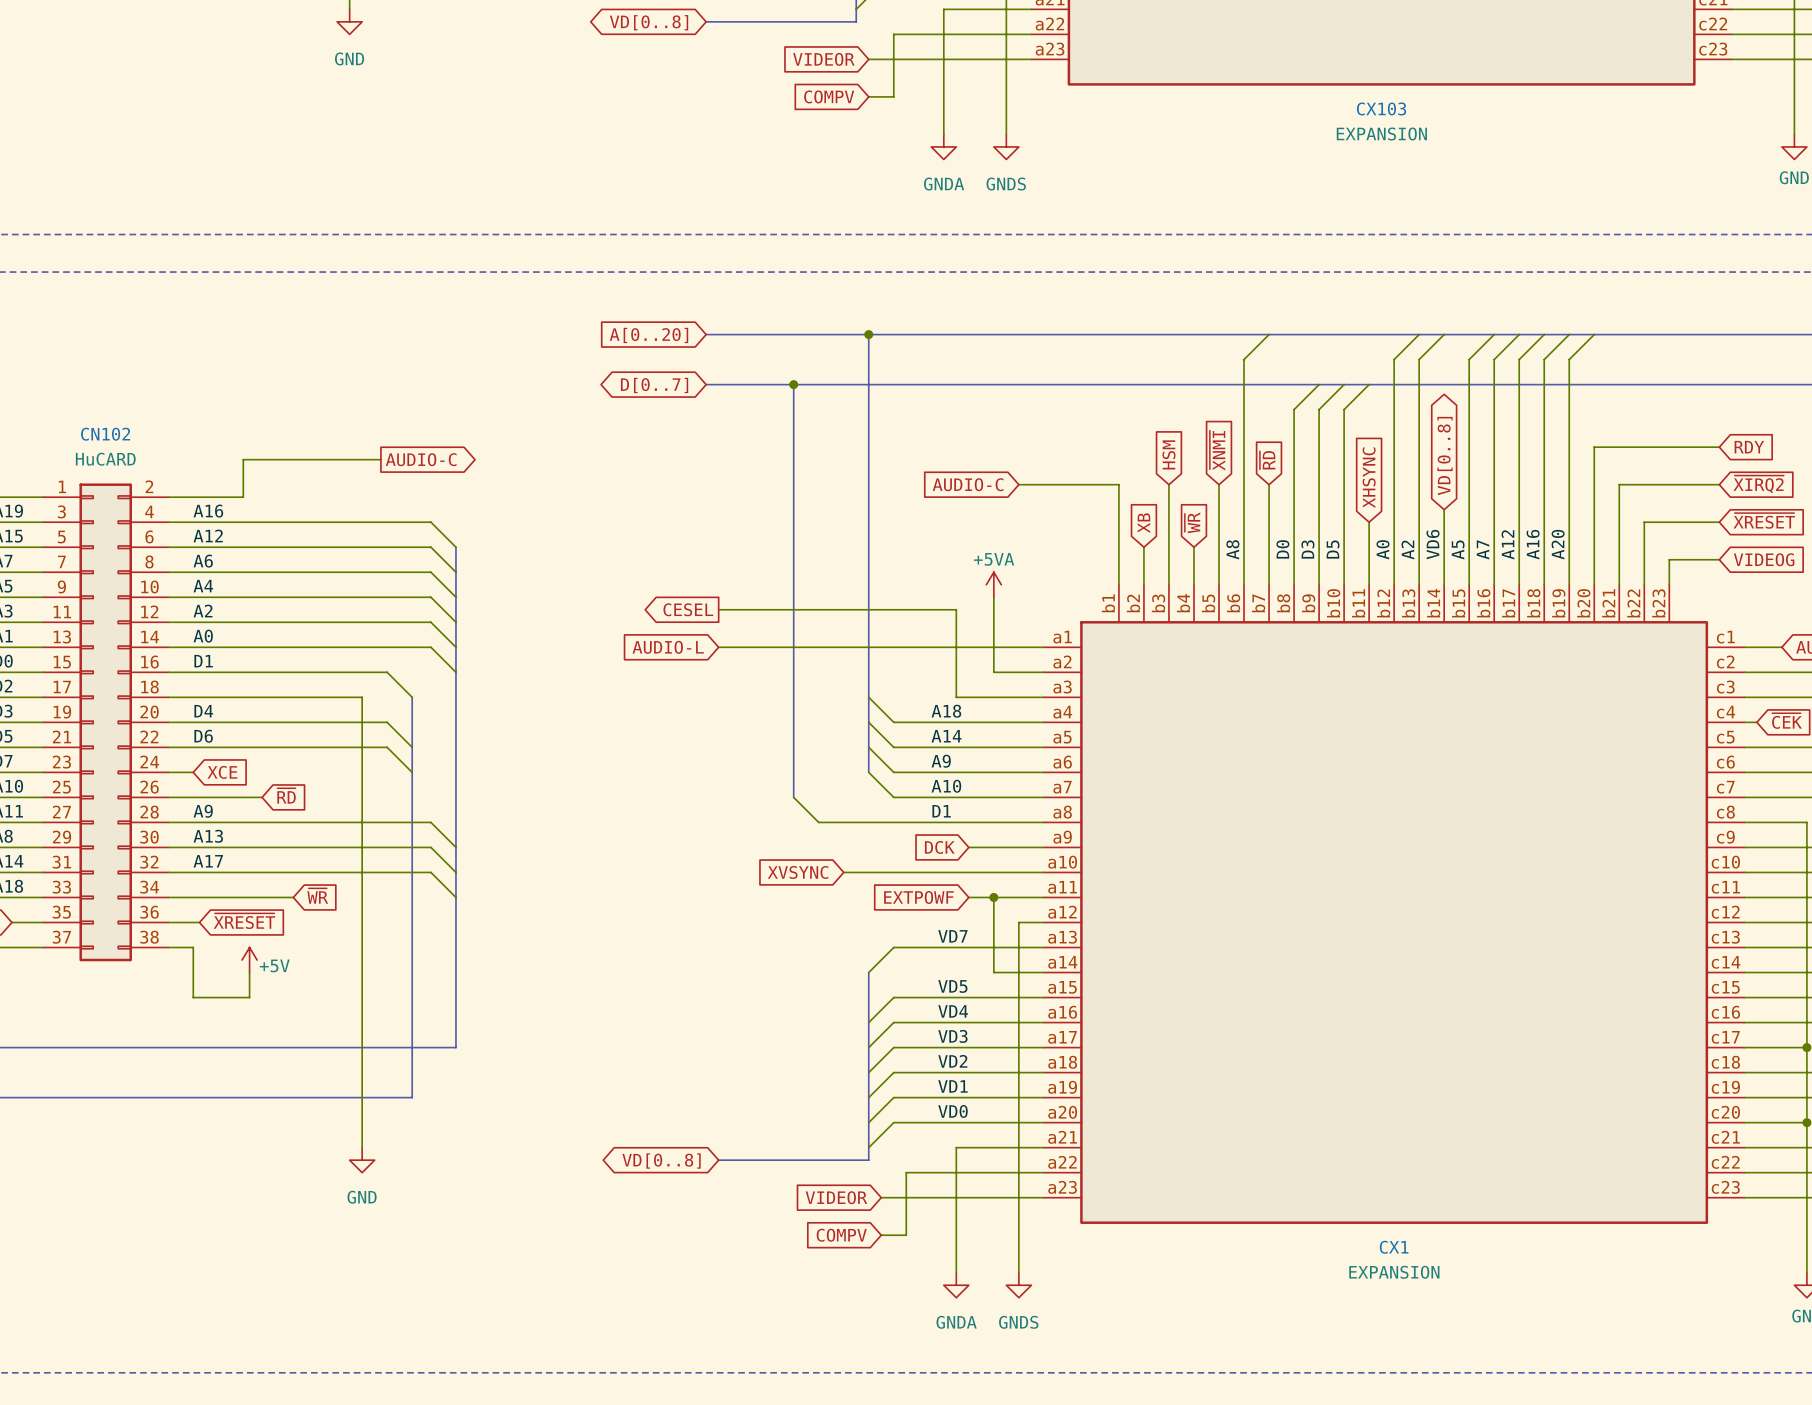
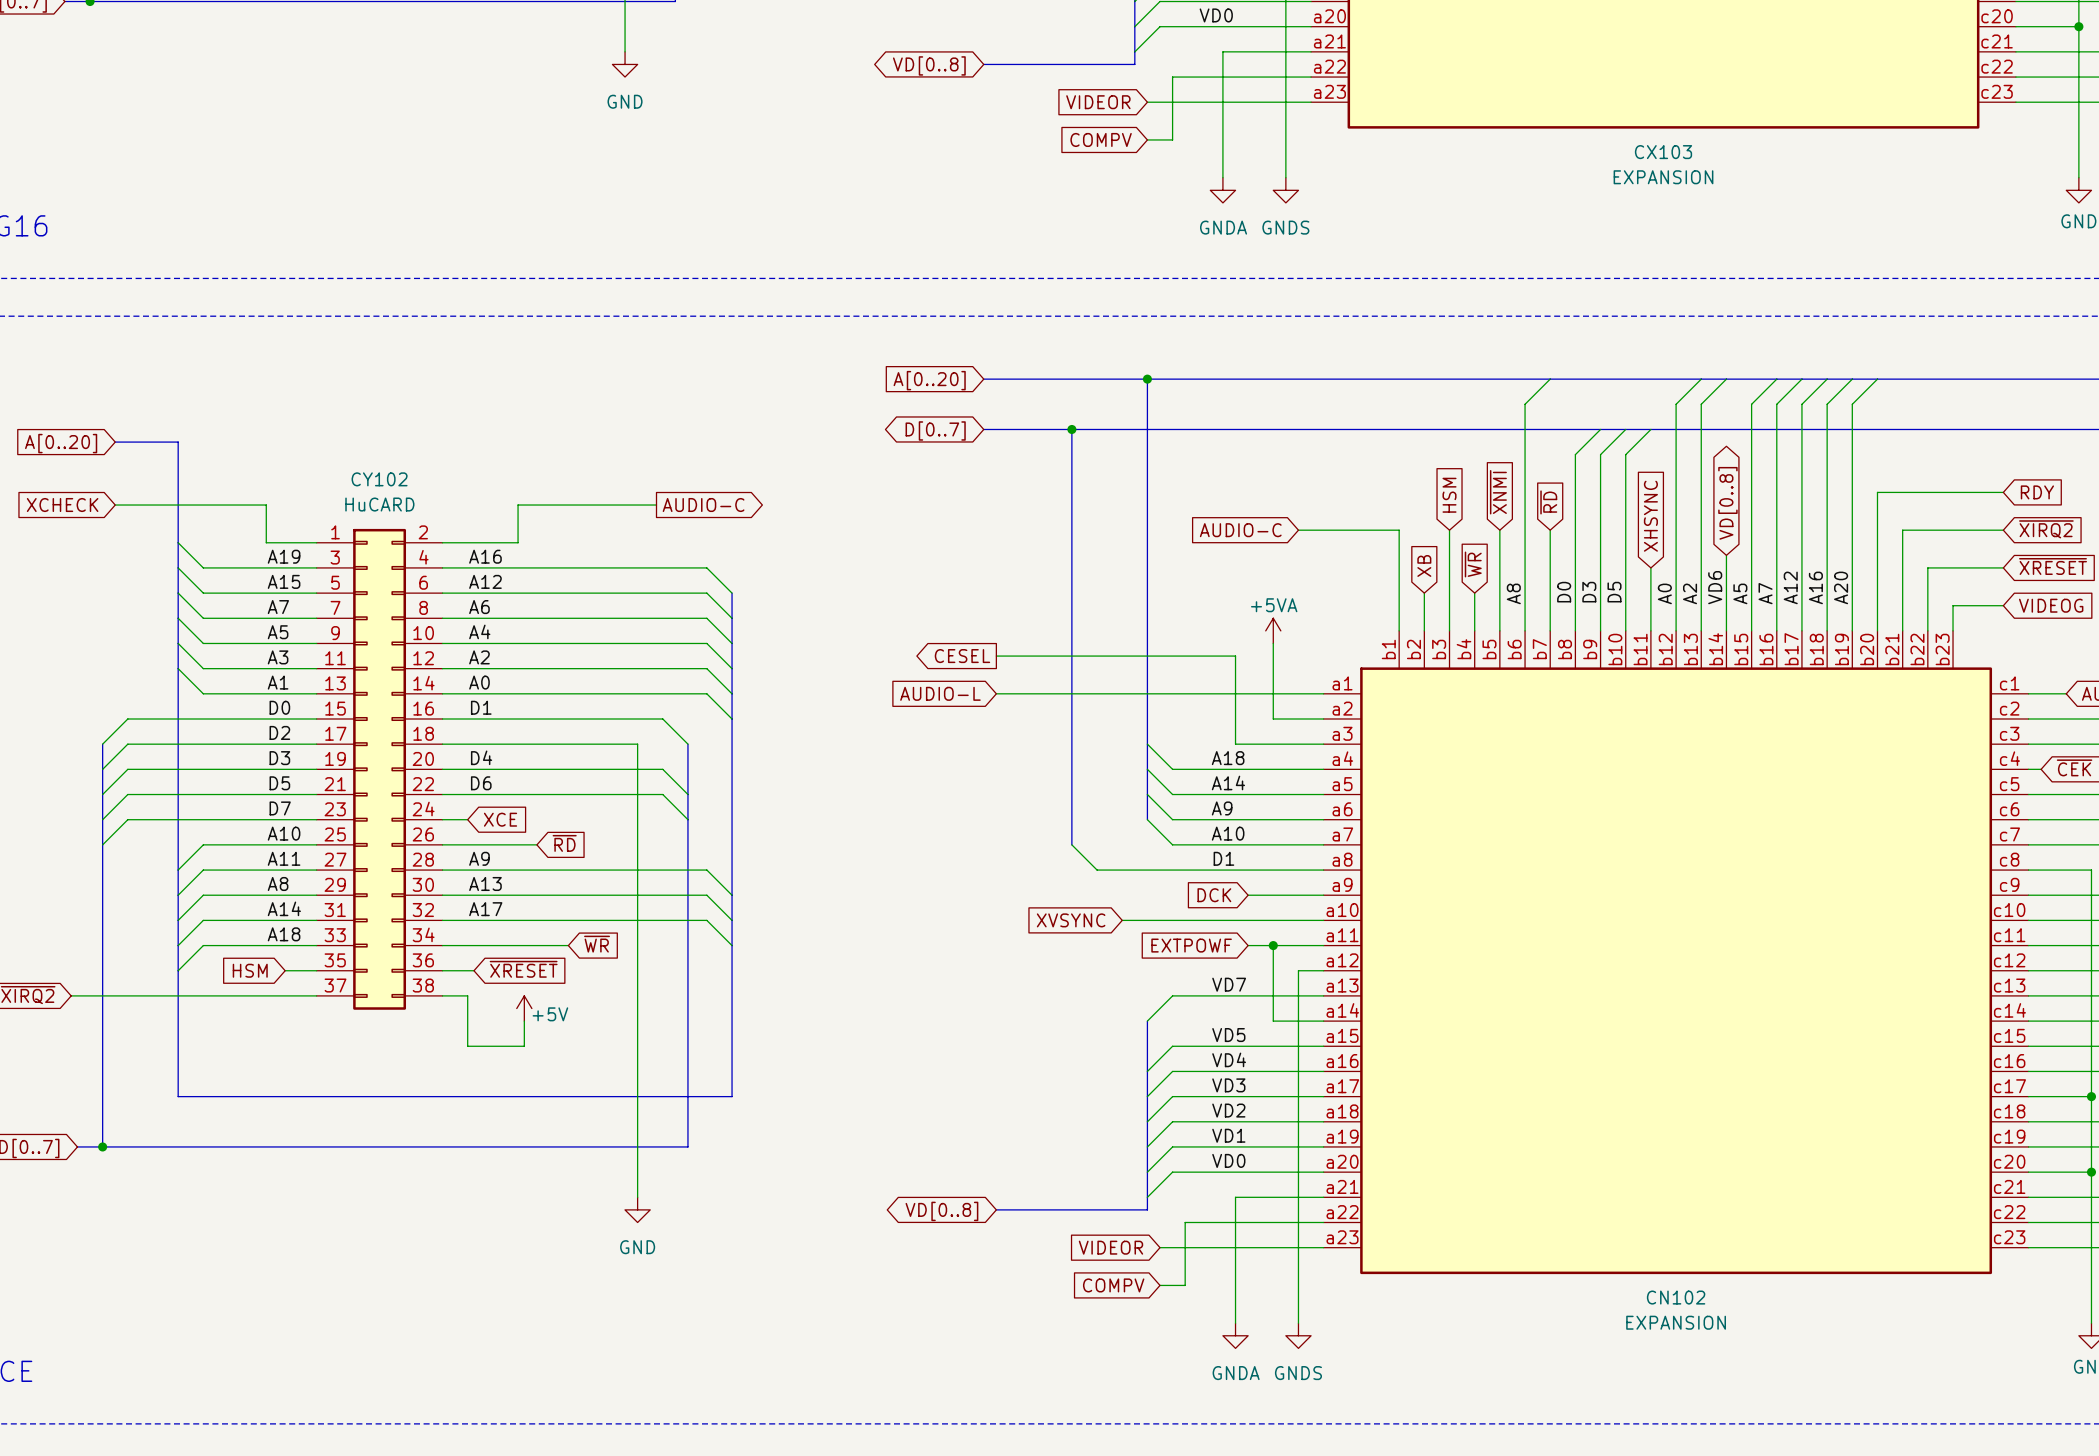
CN102 name: CN102 (105, 434) -> CY102 (379, 479)
CX1 name: CX1 (1394, 1247) -> CN102 (1676, 1297)

